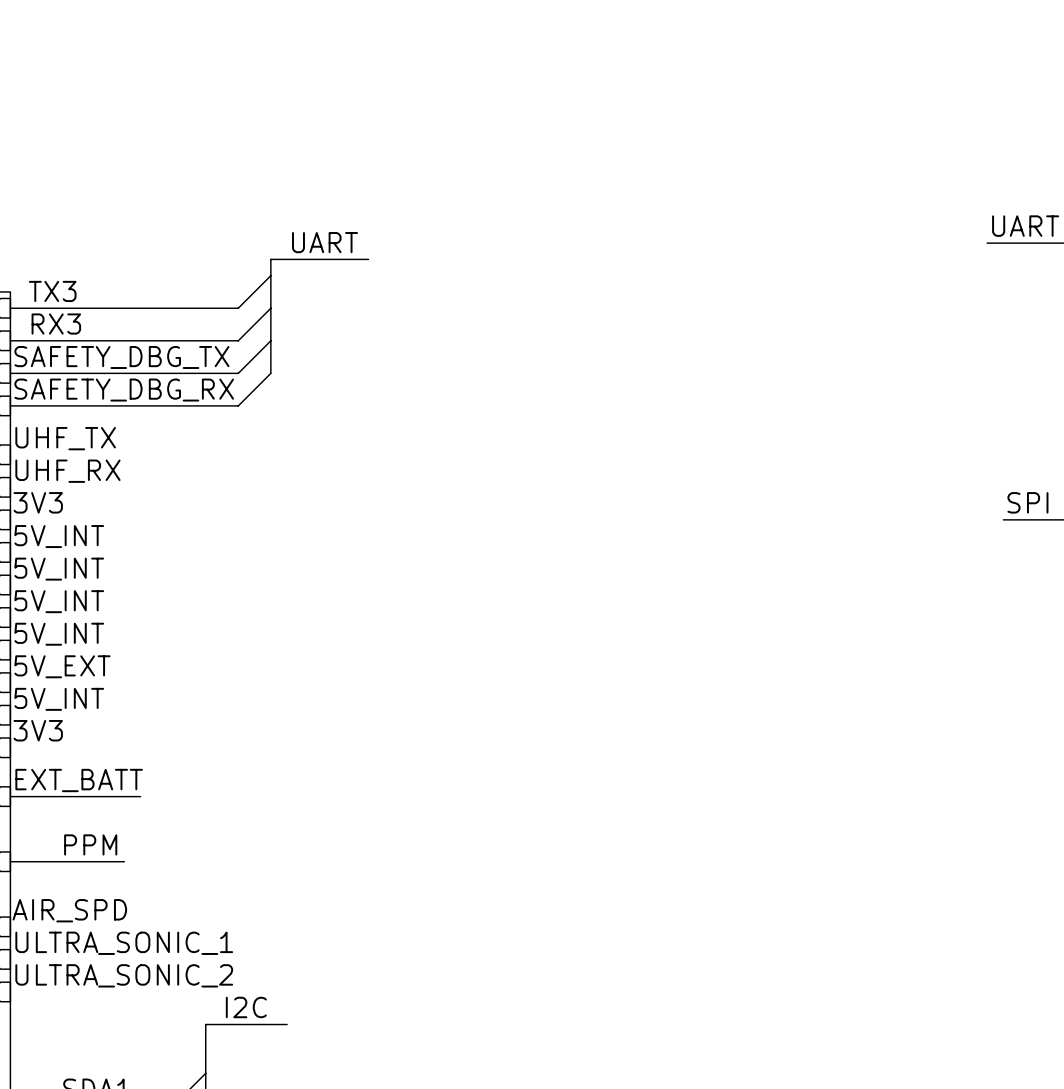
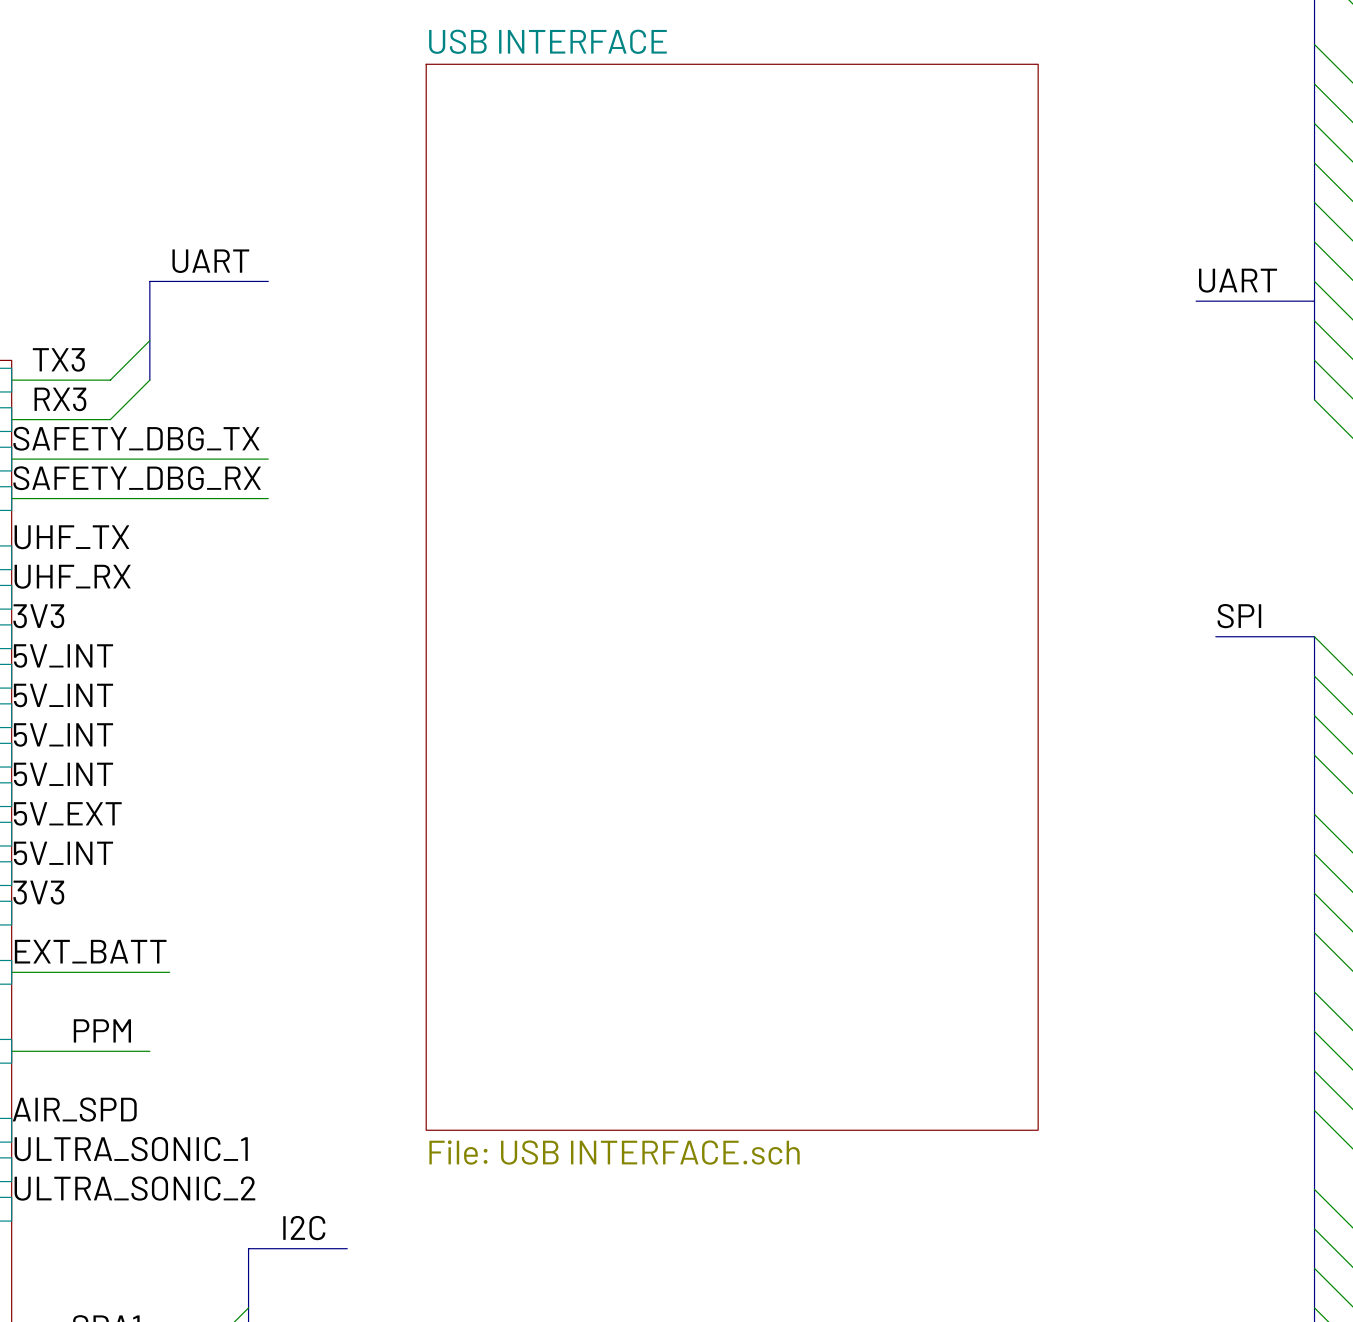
bus: none -> (268, 281) (149, 281) (149, 380)
label position: UART (325, 242) -> UART (210, 261)
bus: (368, 259) (270, 259) (270, 373) -> none
wire: (270, 275) (238, 308) (91, 308) -> (149, 340) (110, 380)
wire: (270, 308) (238, 340) (91, 340) -> (149, 380) (110, 419)
wire: (270, 340) (238, 373) (222, 373) -> none
wire: (270, 373) (238, 405) (222, 405) -> none
sheet USB INTERFACE: none -> File: USB INTERFACE.sch (732, 597)

